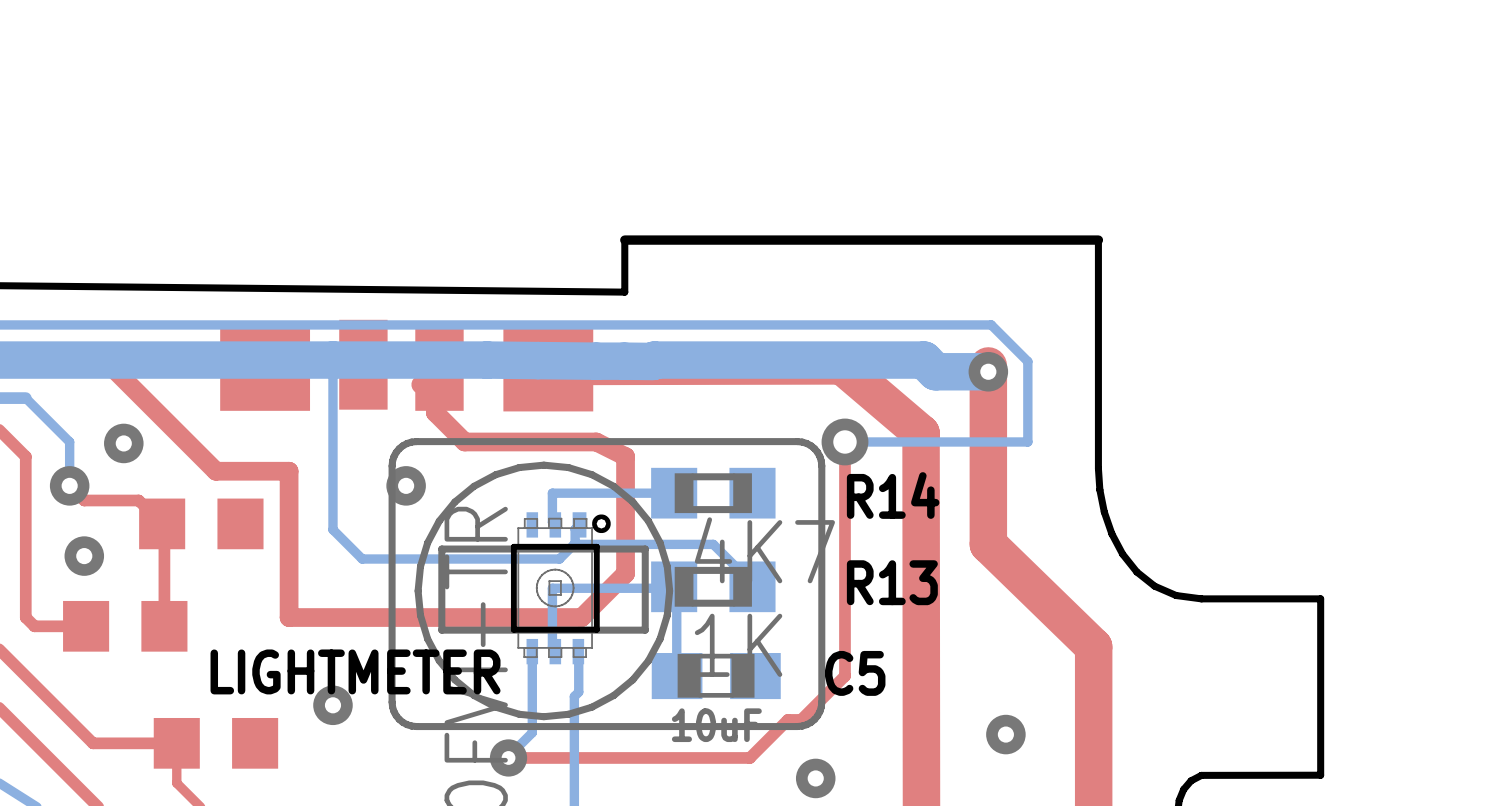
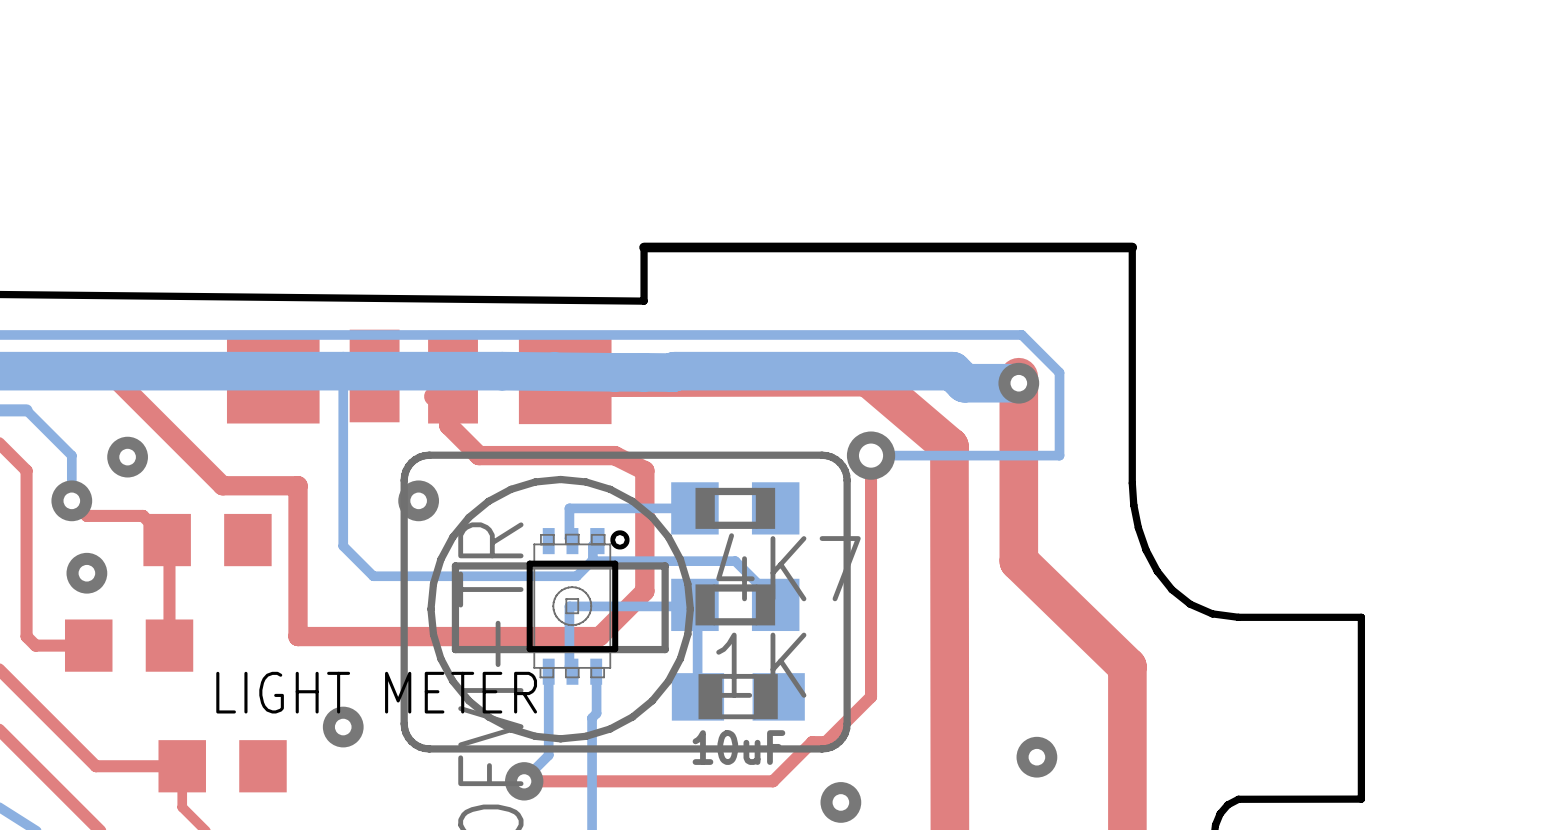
R14 name: R14 (893, 495) -> none
R13 name: R13 (892, 582) -> none
text: LIGHTMETER (355, 671) -> LIGHT METER (376, 692)
C5 name: C5 (855, 673) -> none

